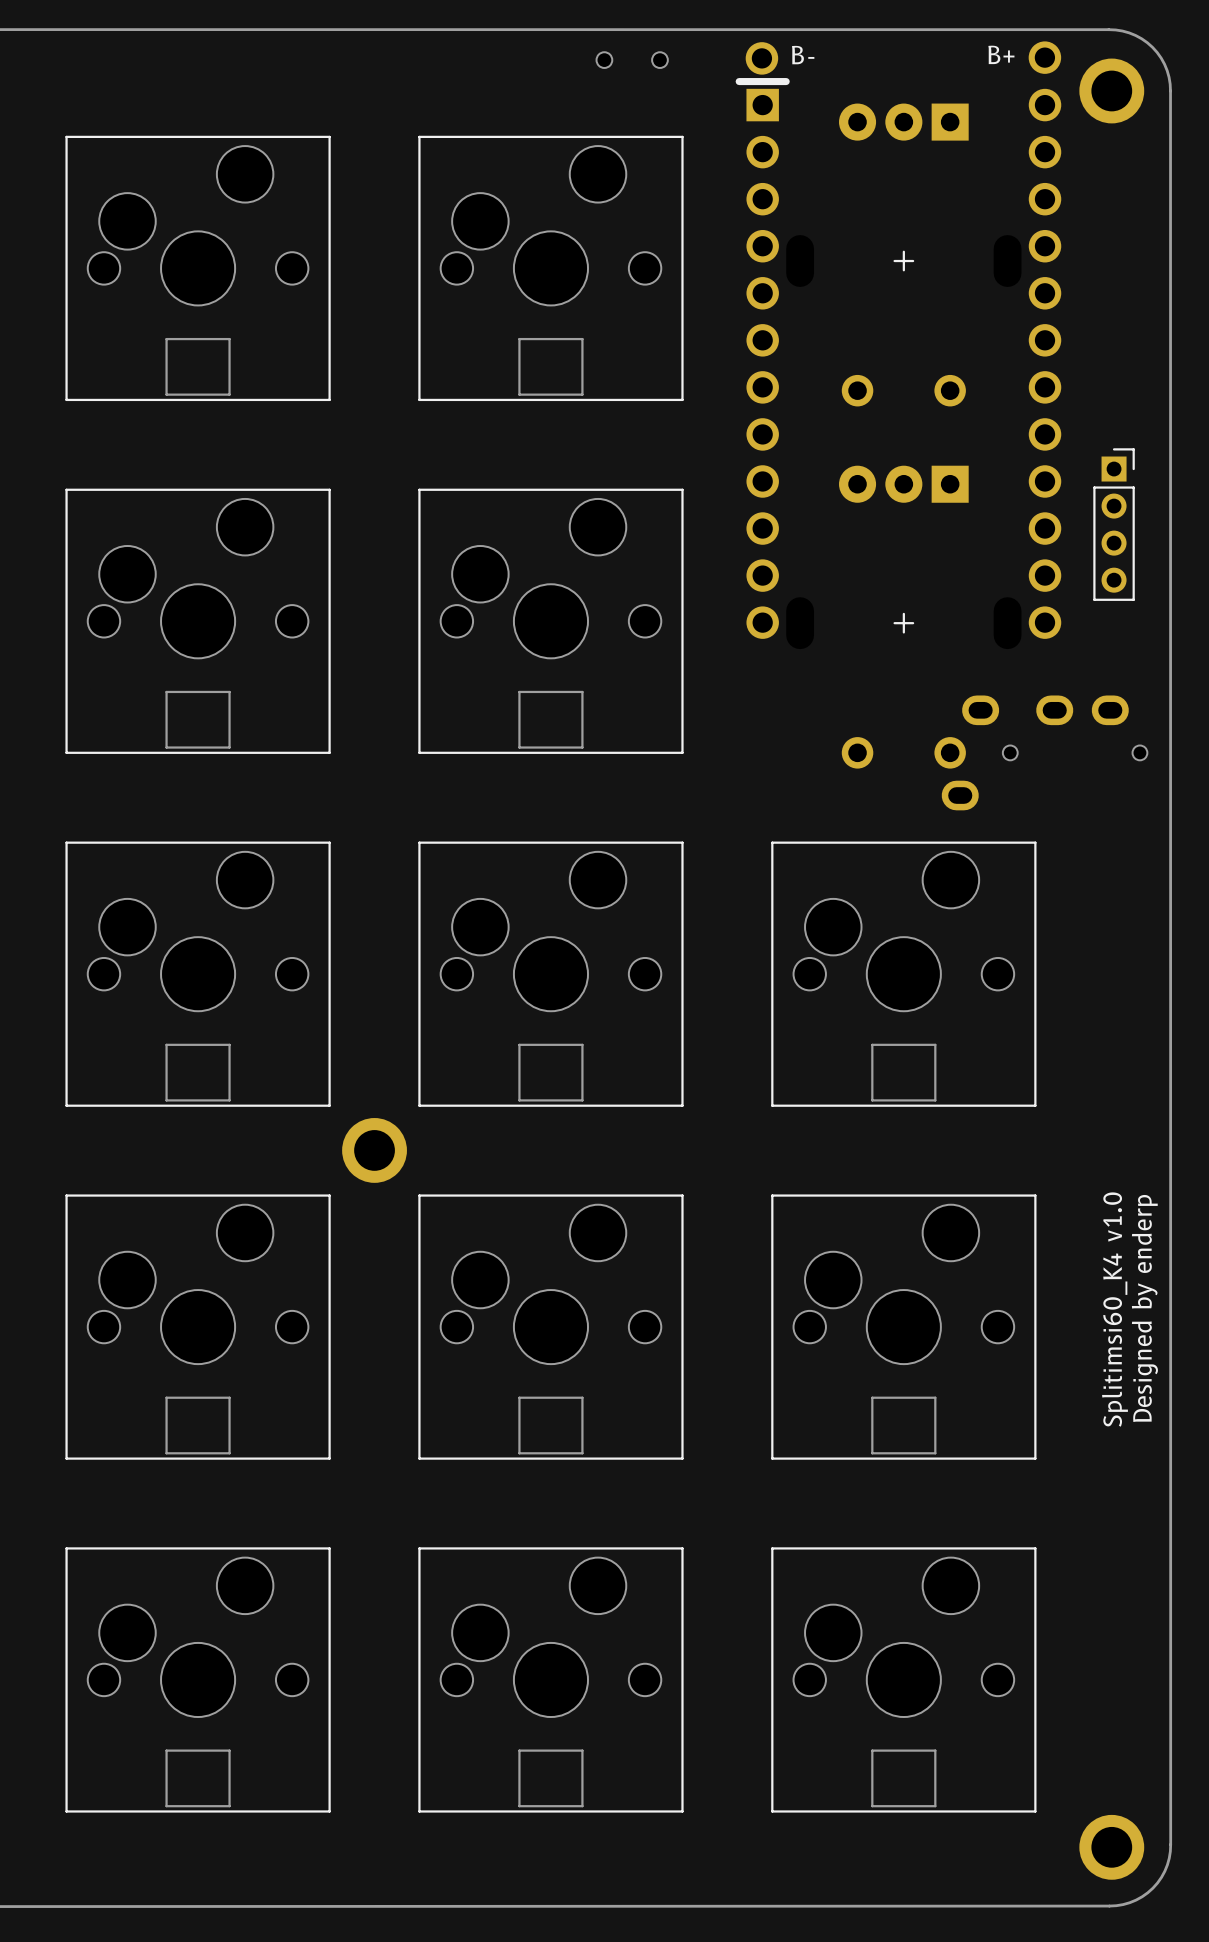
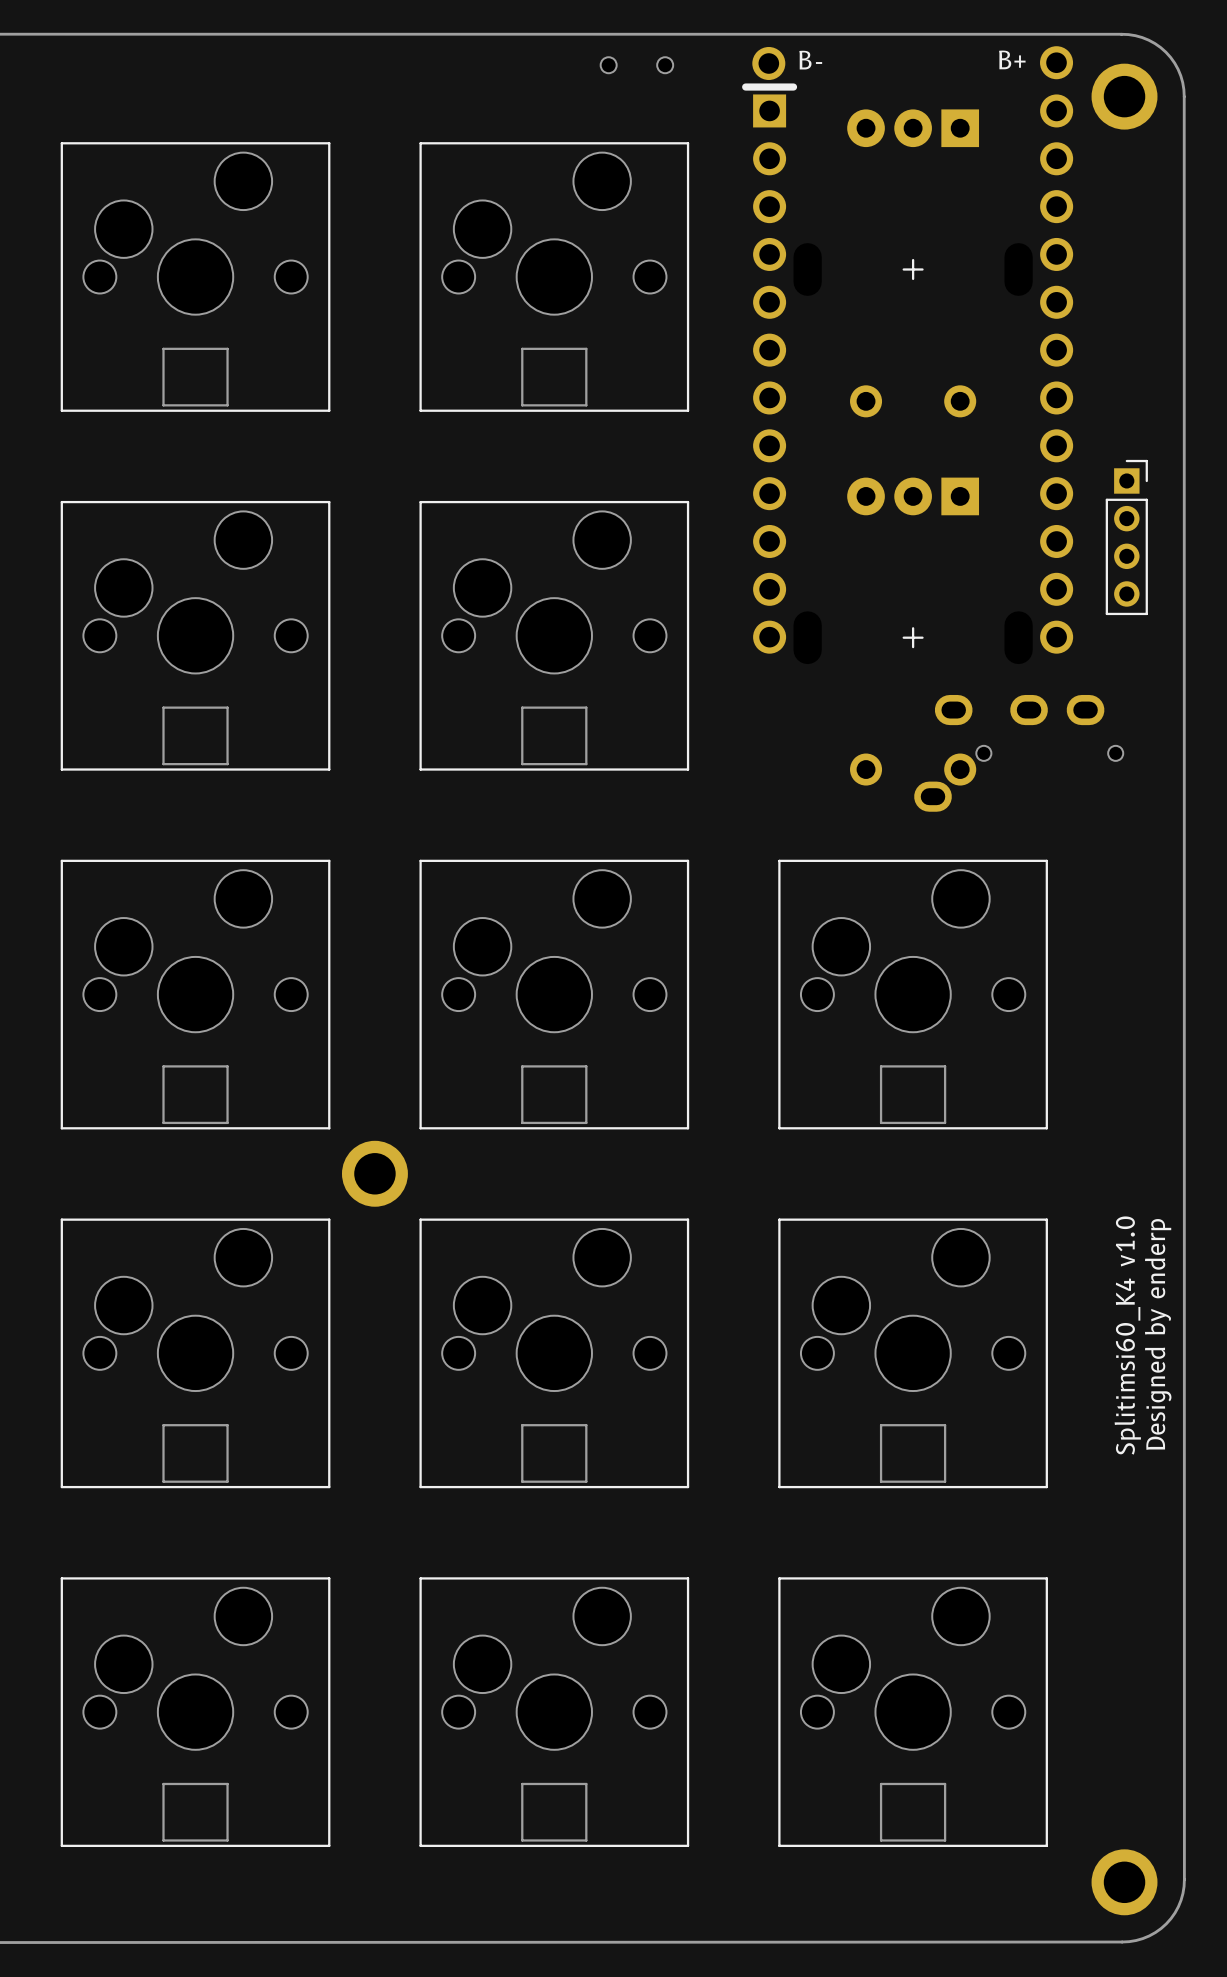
part position: (1044, 752) -> (1018, 753)

